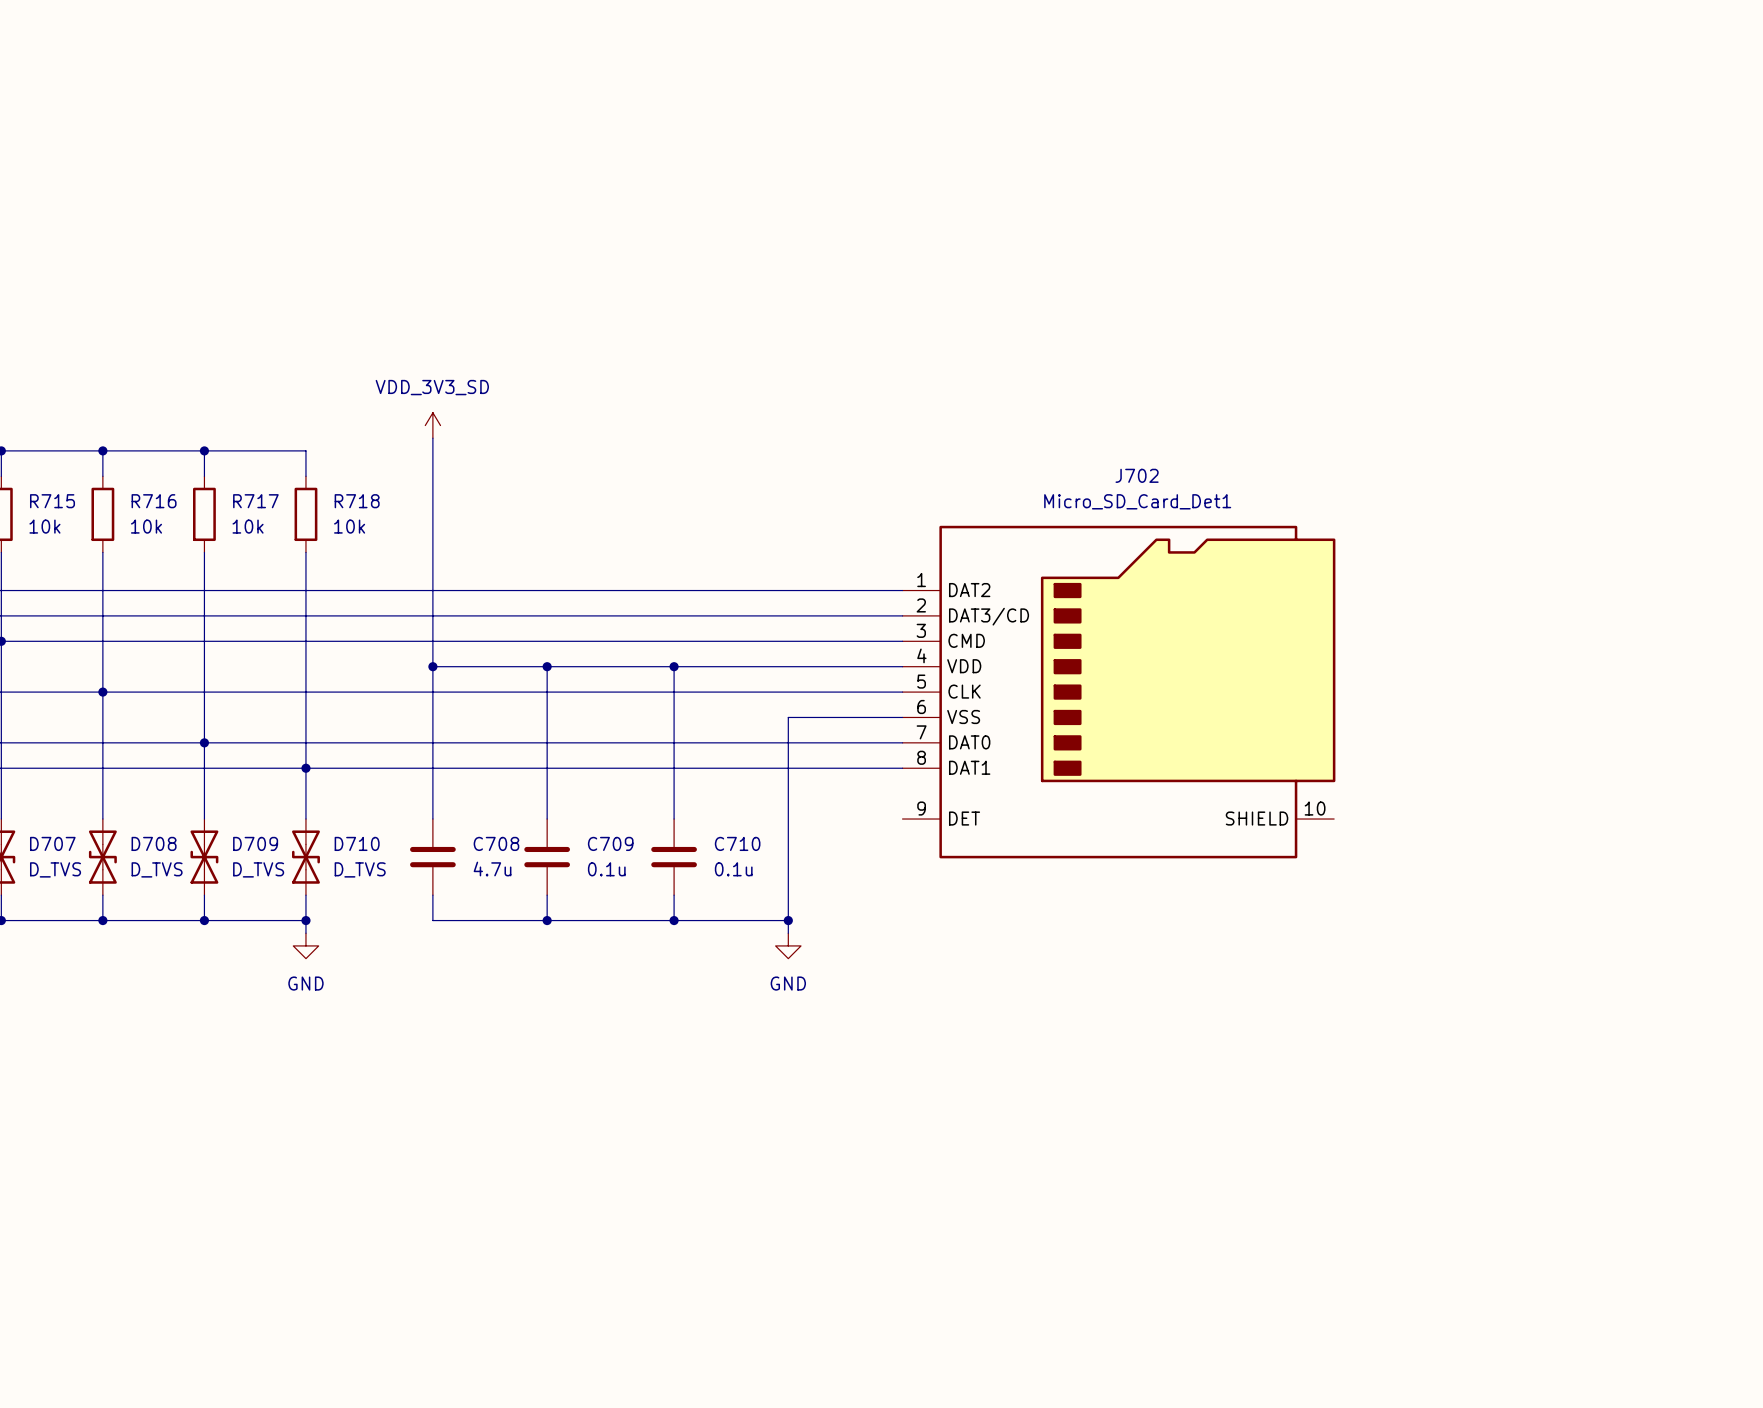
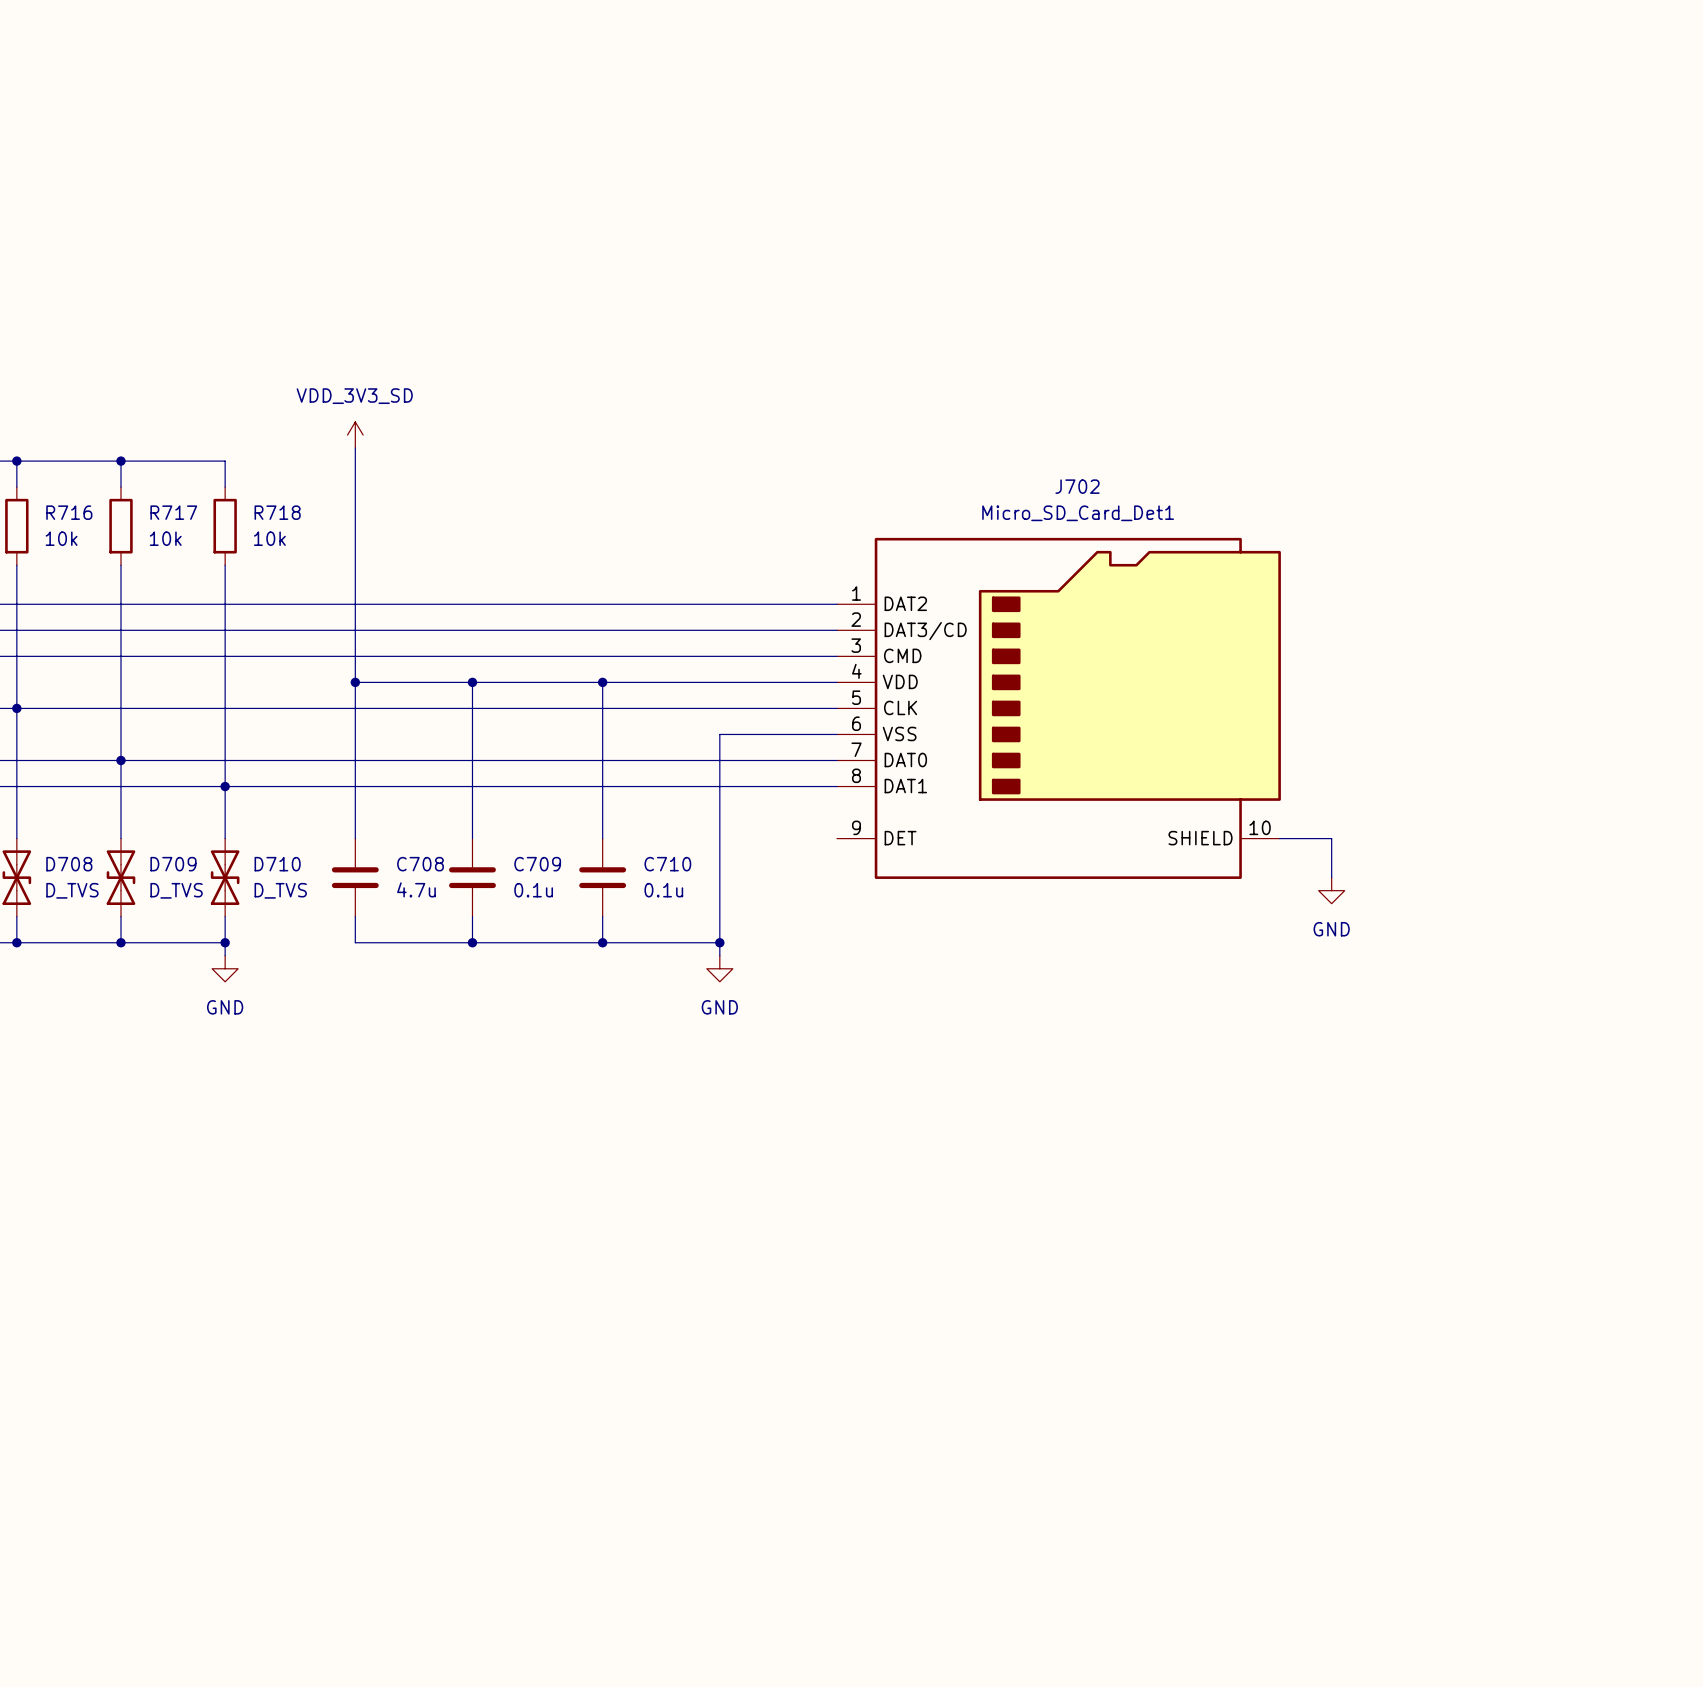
wire: none -> (1279, 838) (1331, 838) (1331, 877)
power symbol: none -> GND (1331, 890)

